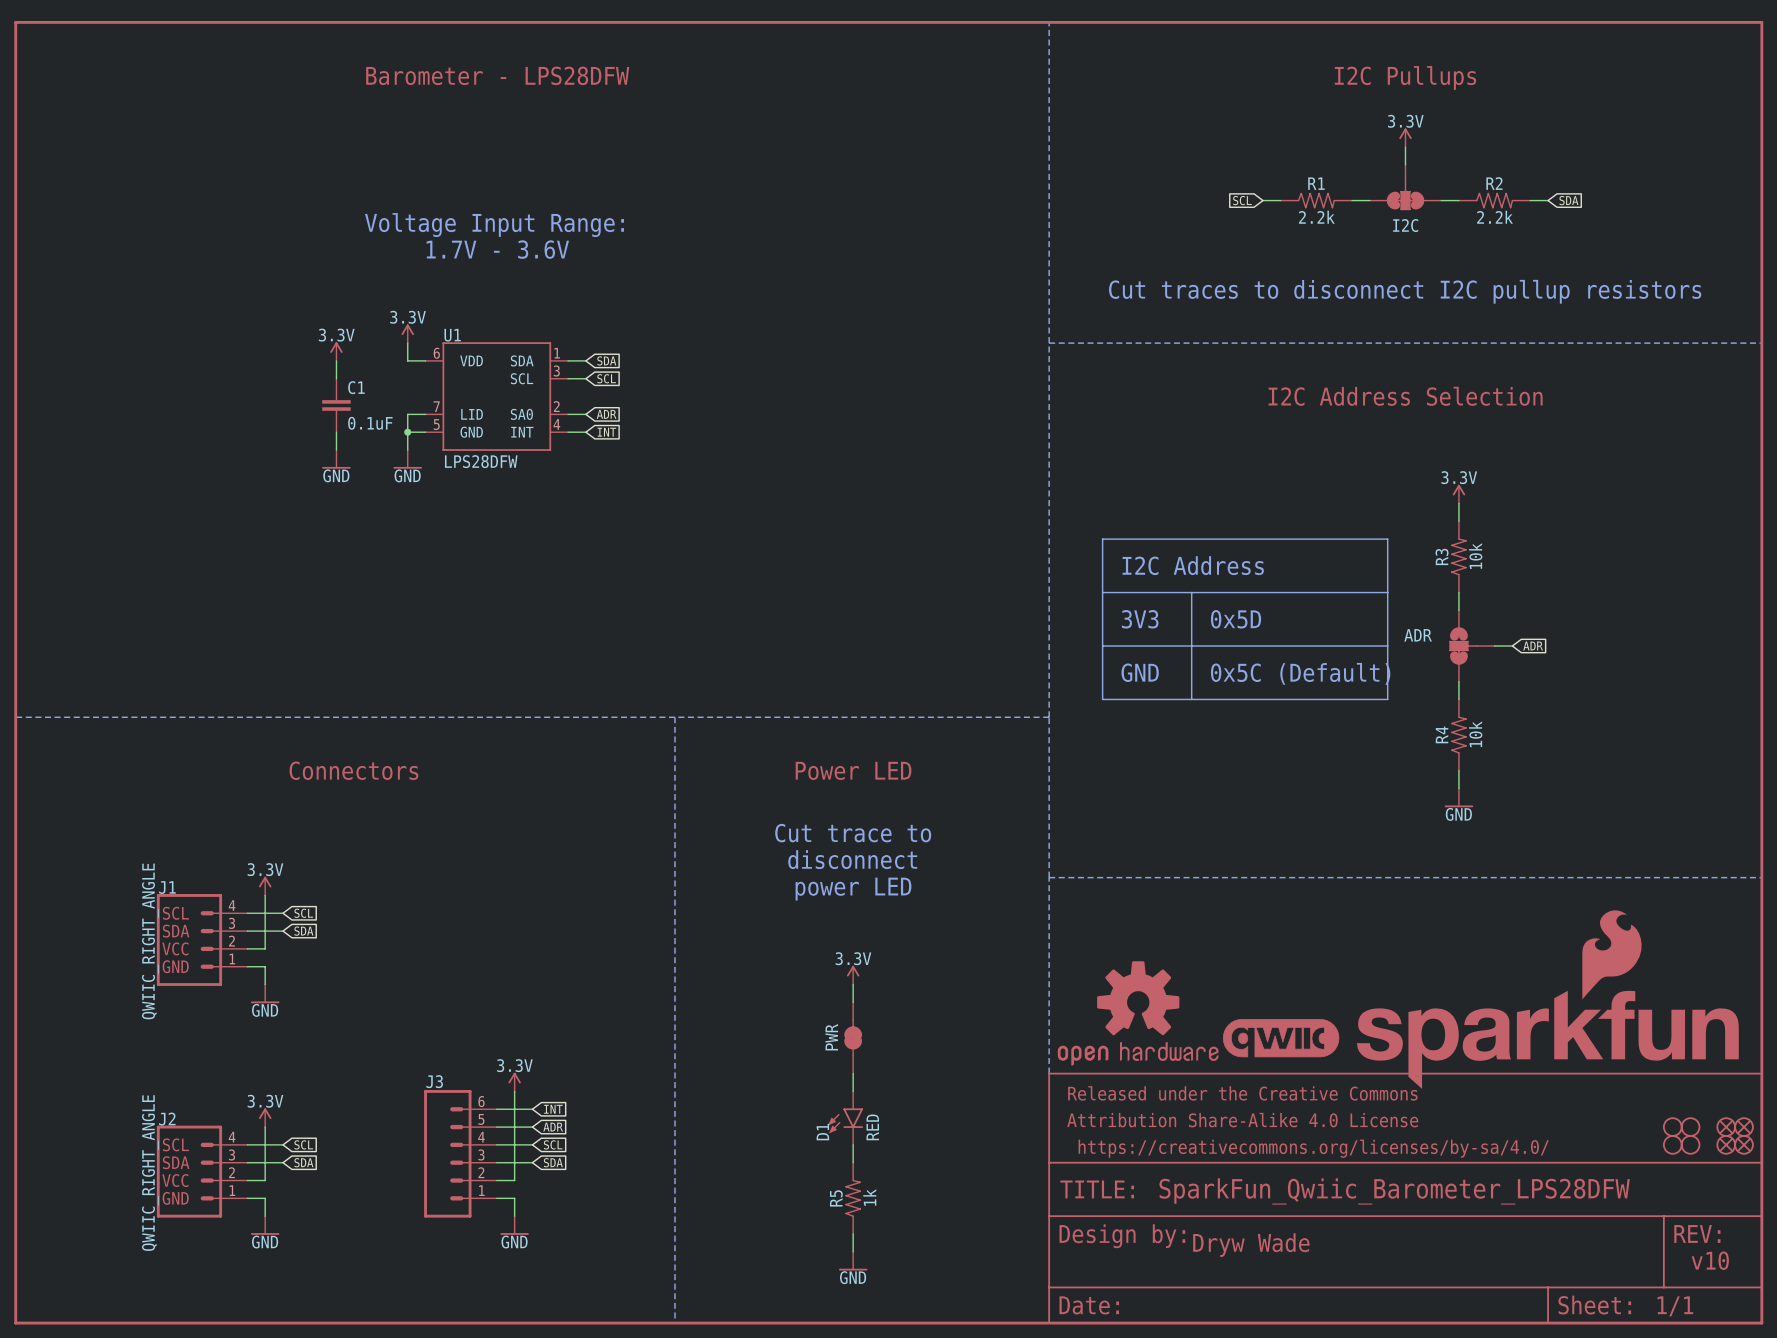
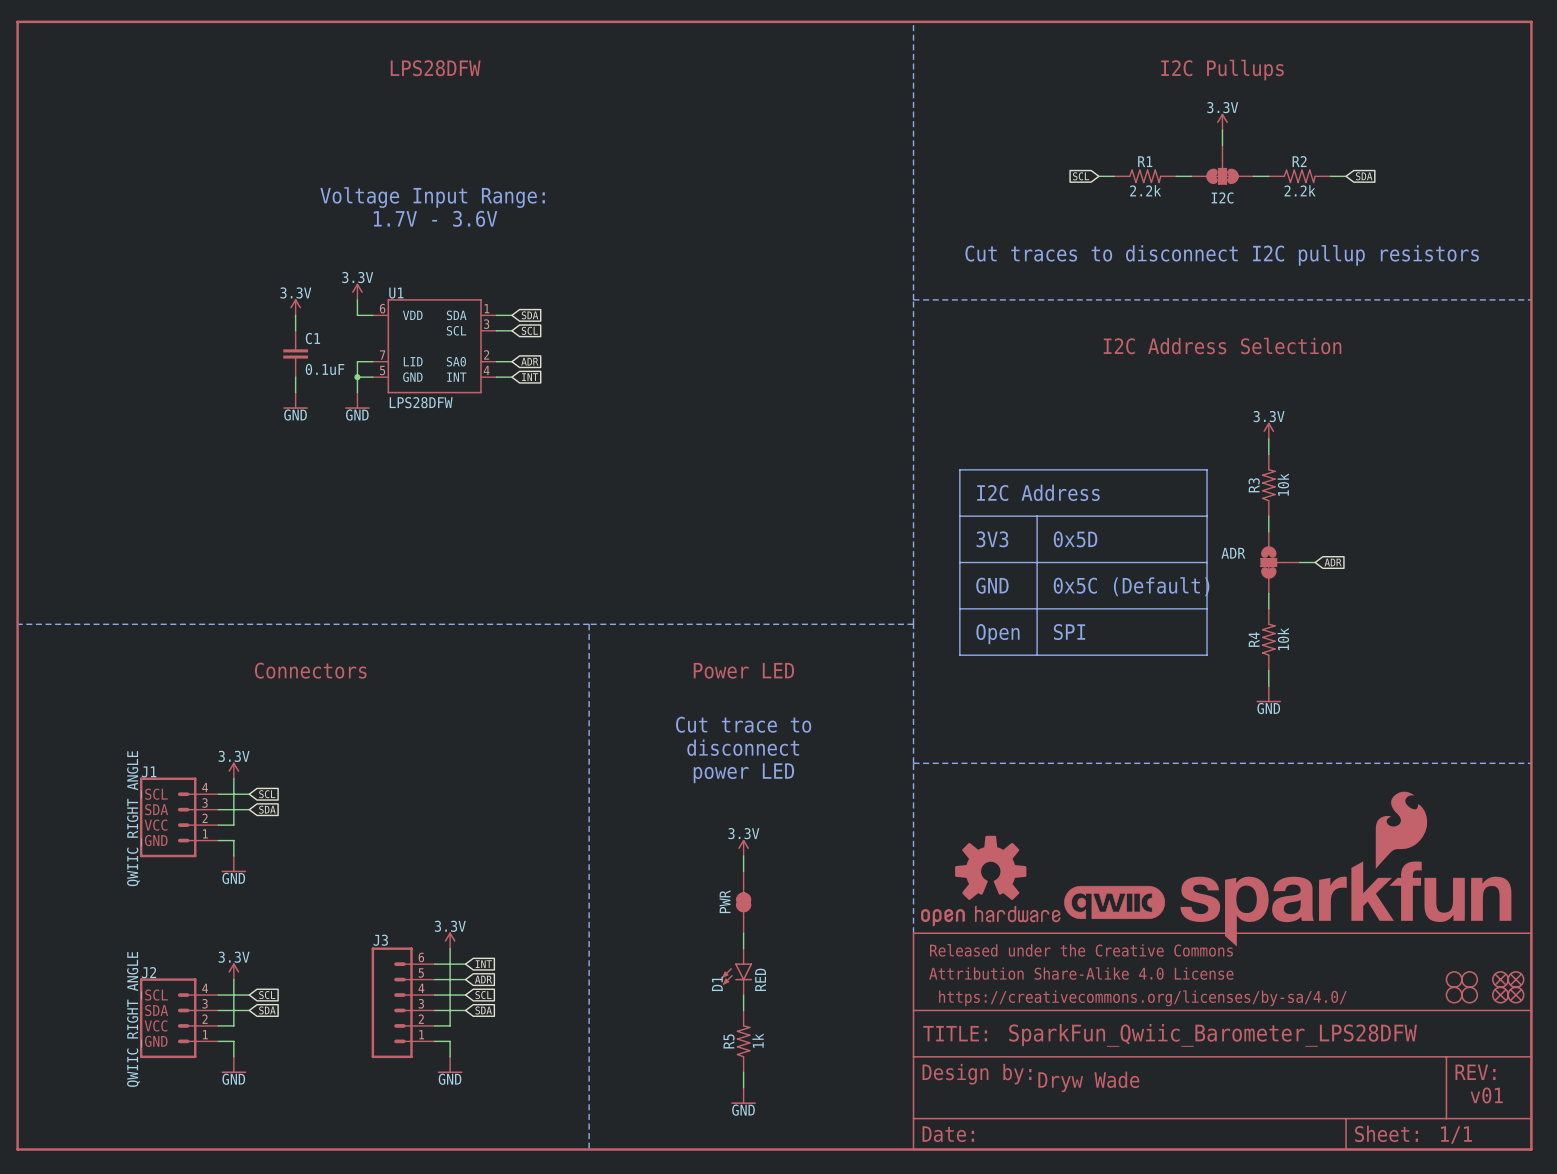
text: Barometer - LPS28DFW (497, 75) -> LPS28DFW (435, 68)
line: none -> (959, 608) (959, 655) (1207, 655) (1207, 608)
line: none -> (1037, 608) (1037, 655)
text: none -> SPI (1069, 632)
text: none -> Open (997, 634)
text: v10 (1710, 1260) -> v01 (1486, 1095)

